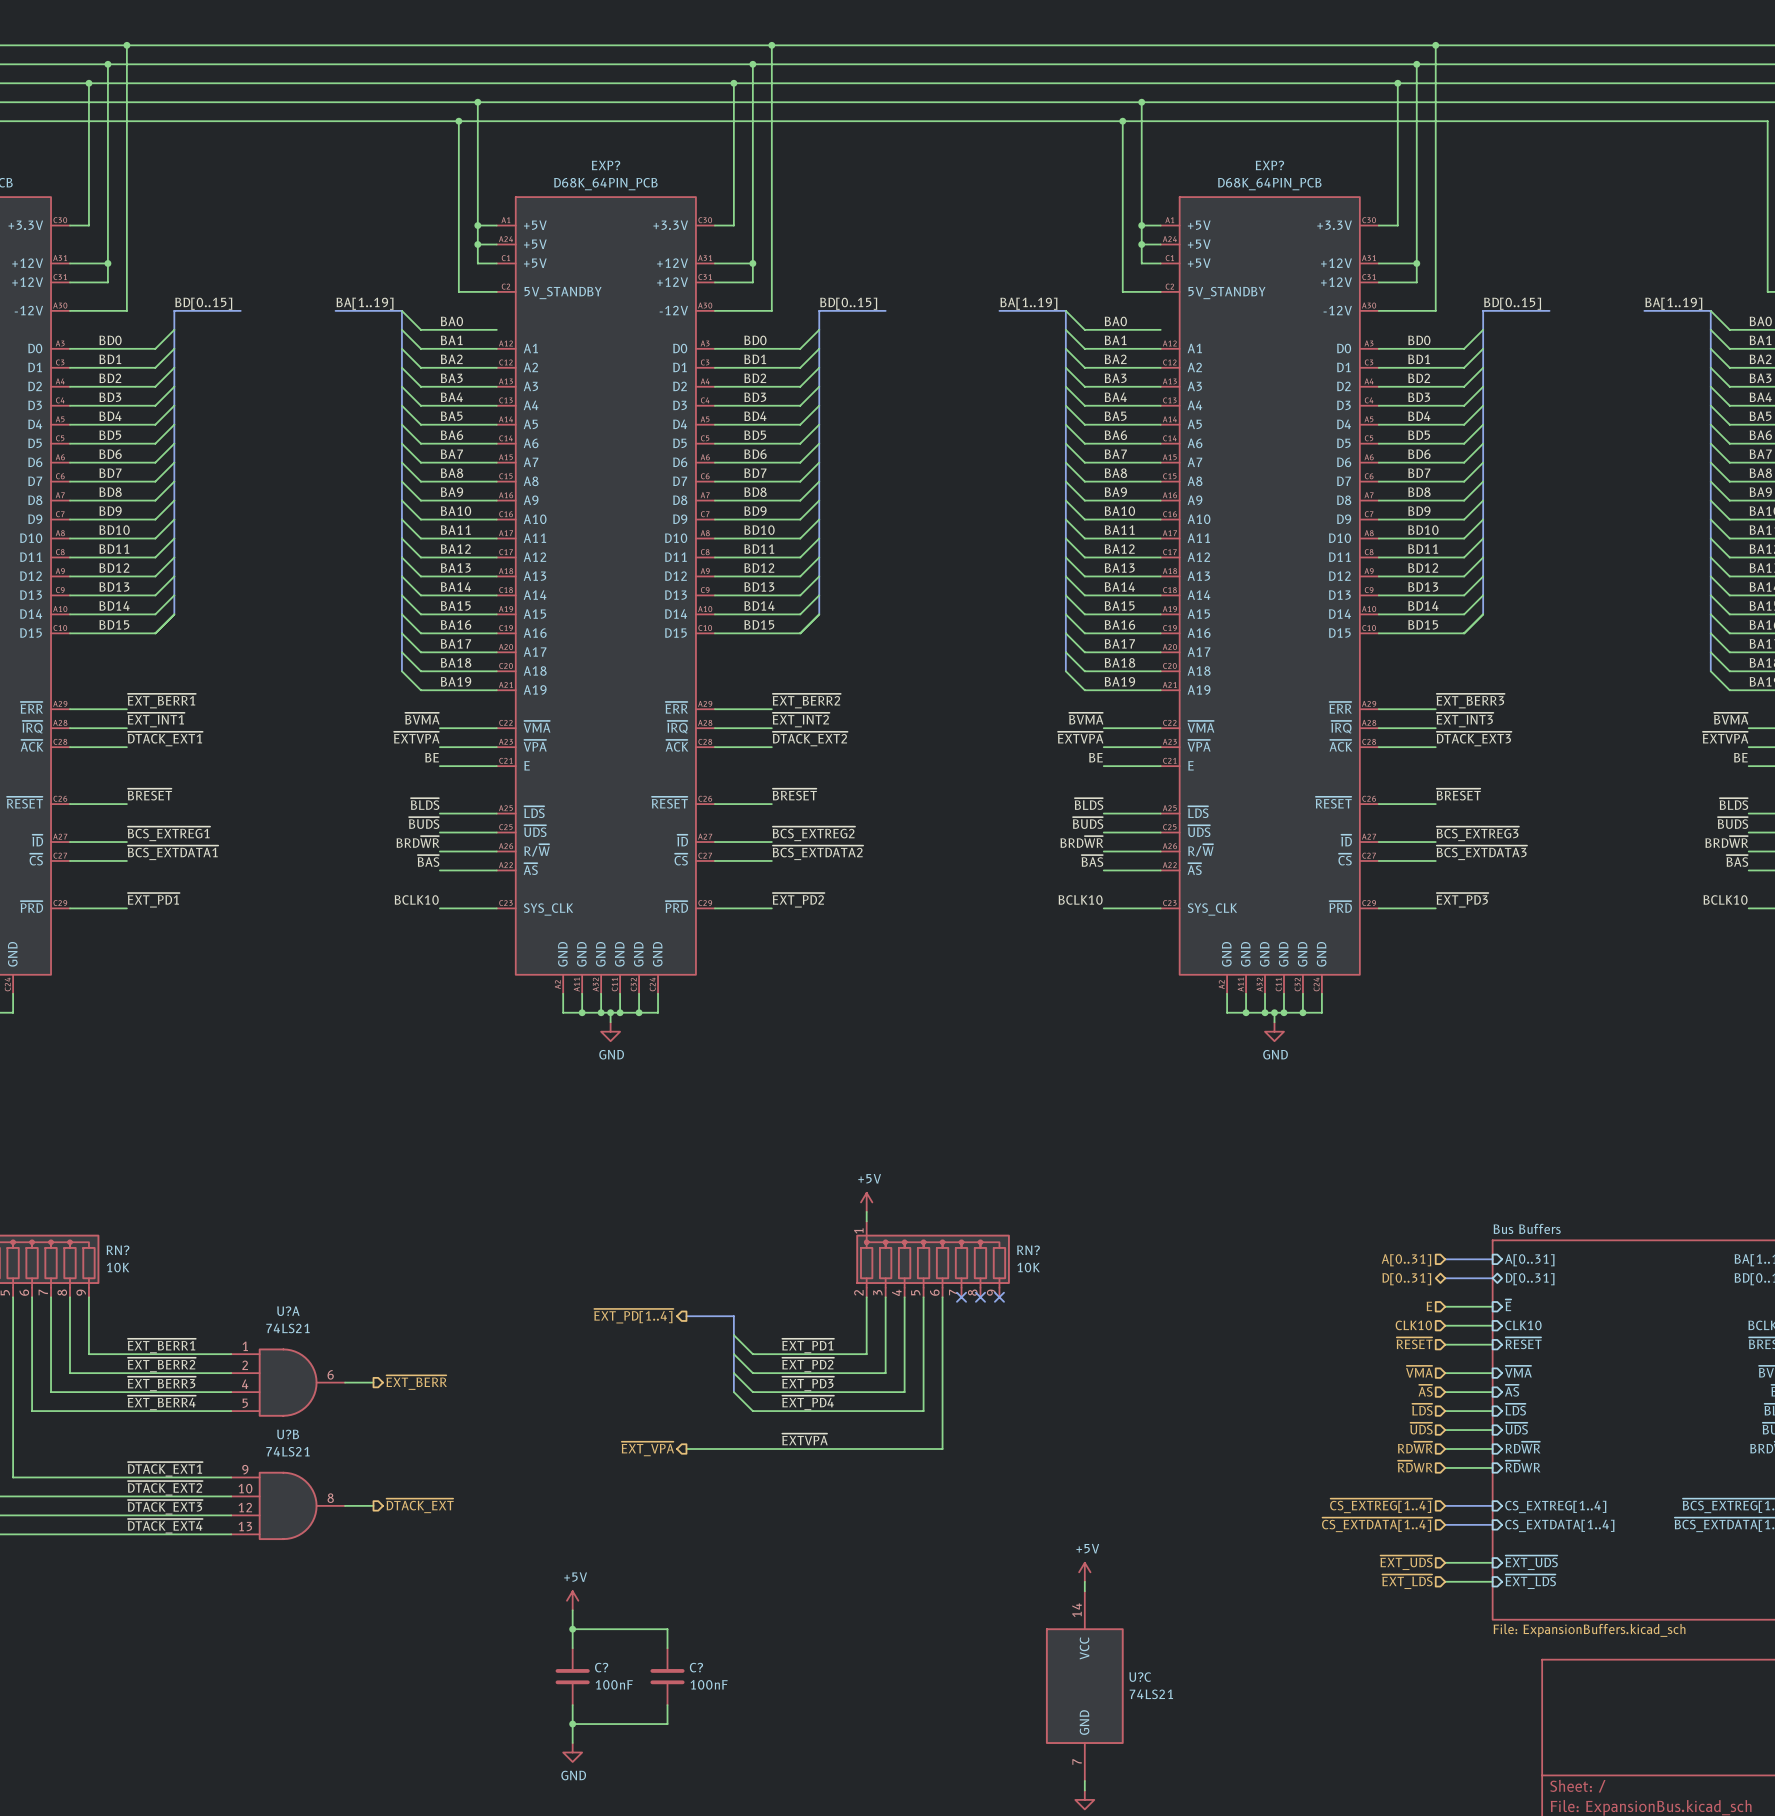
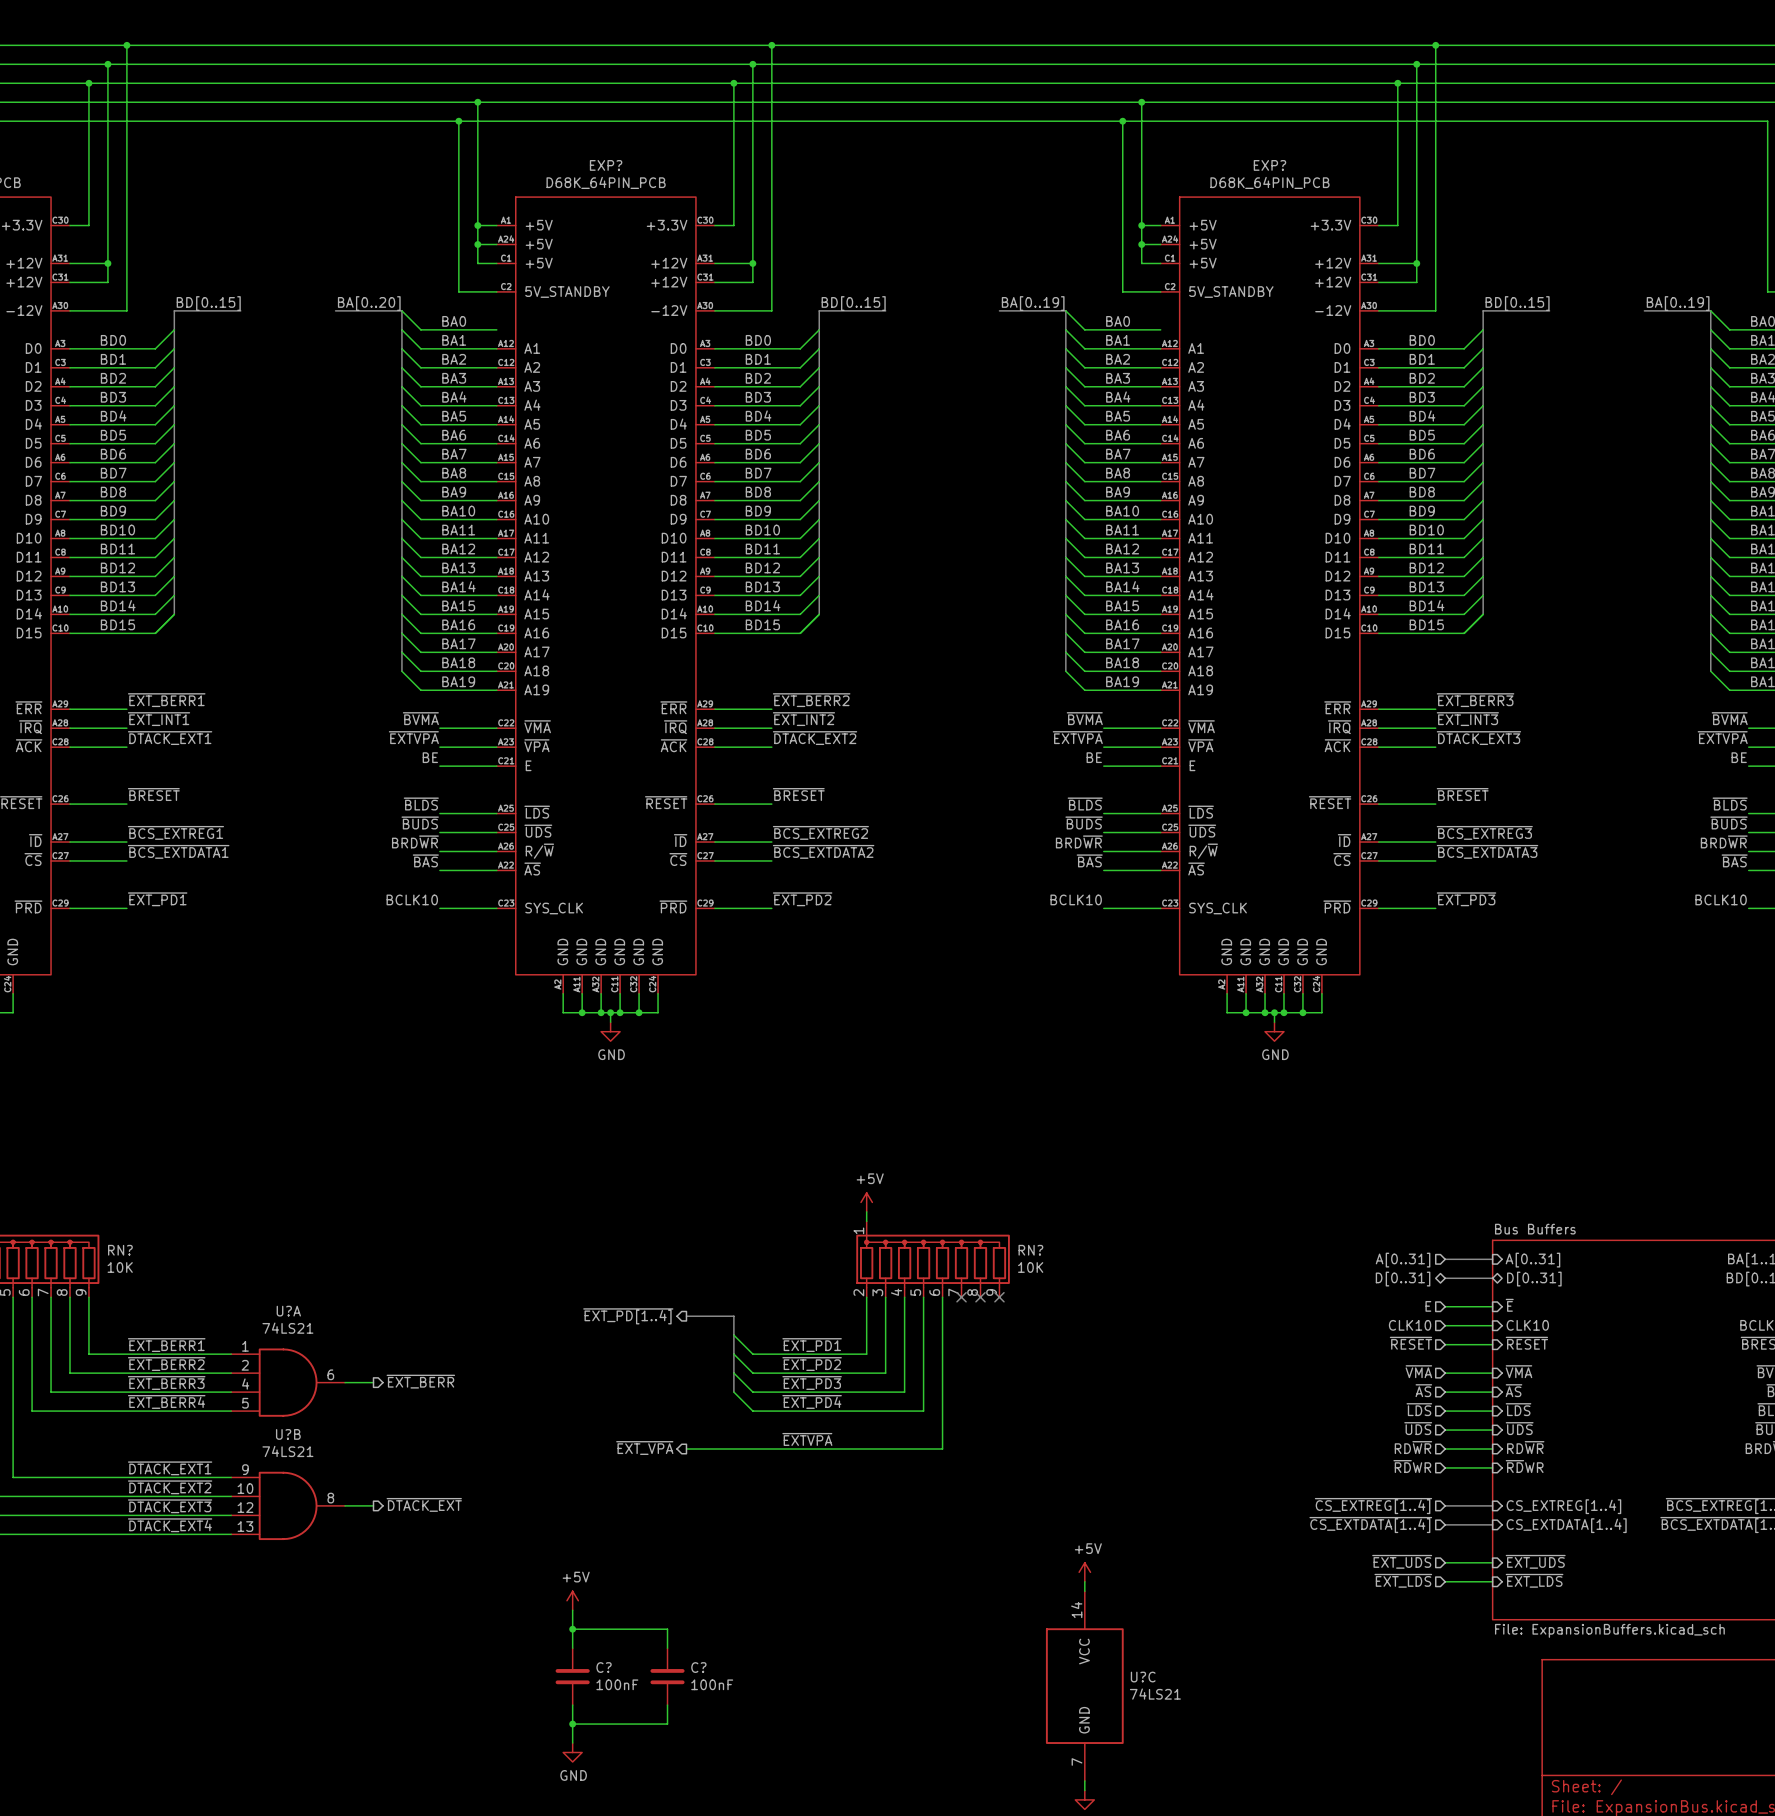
label: BA[1..19] (365, 303) -> BA[0..20] (369, 303)
label: BA[1..19] (1028, 303) -> BA[0..19] (1033, 303)
label: BA[1..19] (1673, 303) -> BA[0..19] (1678, 303)

